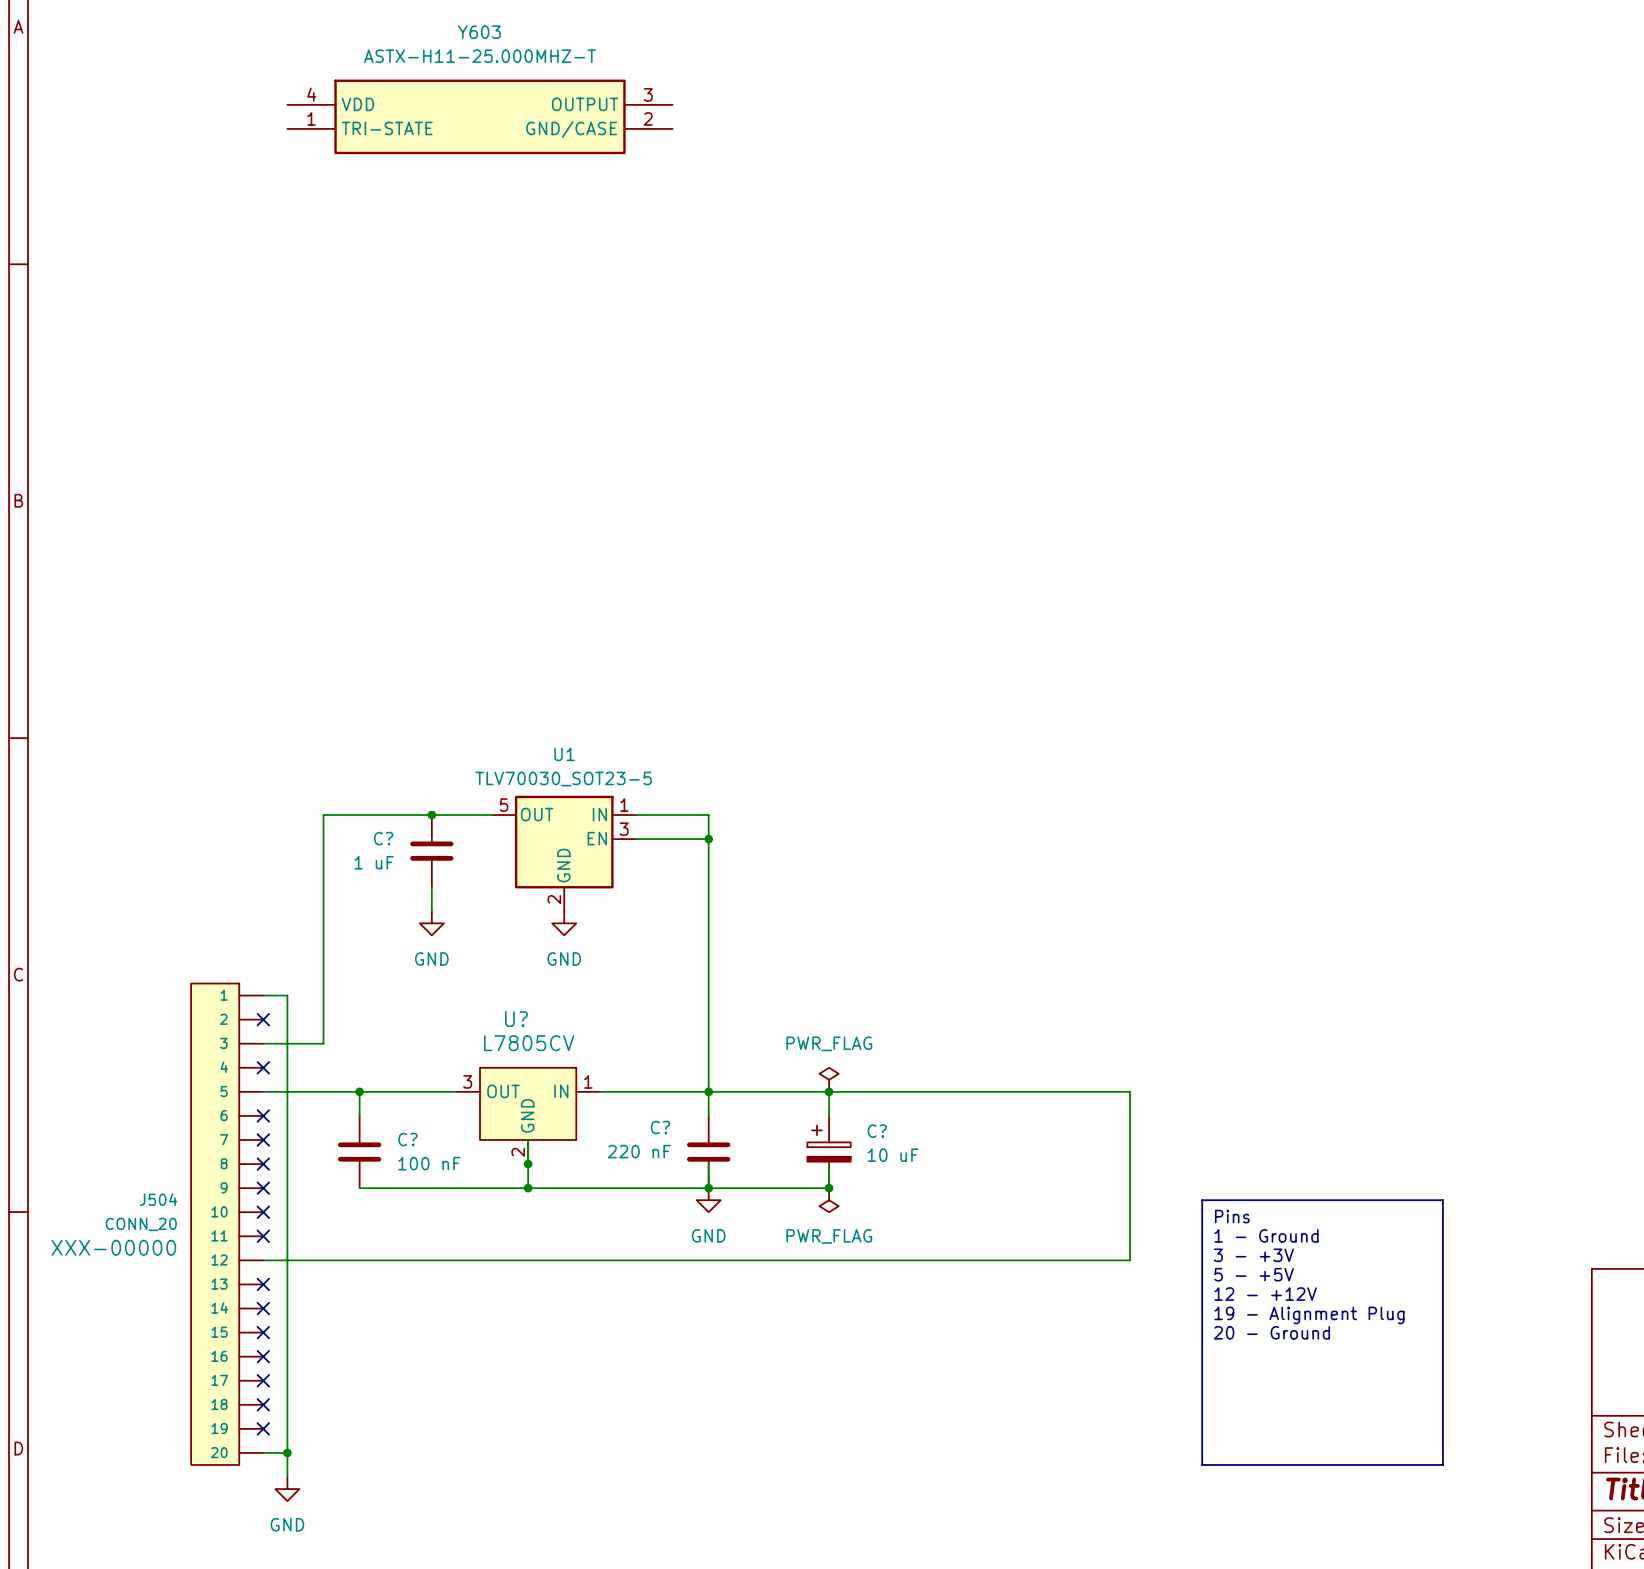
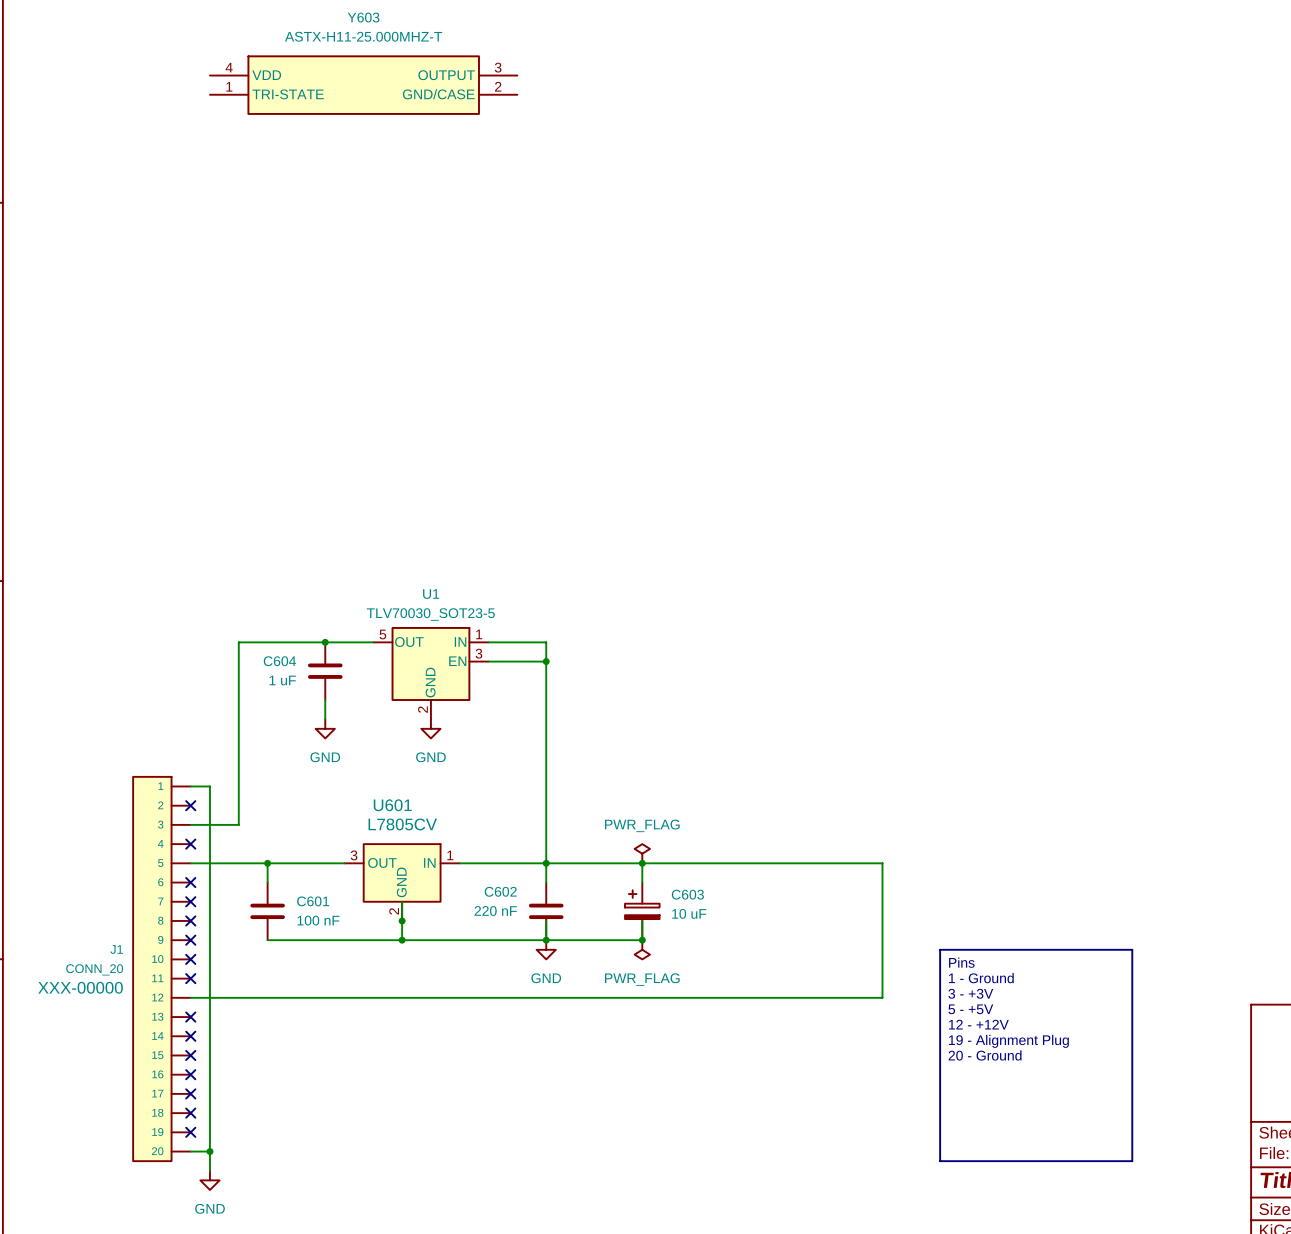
C? name: C? (383, 838) -> C604 (279, 661)
U? name: U? (516, 1019) -> U601 (392, 805)
C? name: C? (660, 1127) -> C602 (500, 891)
C? name: C? (877, 1131) -> C603 (687, 894)
C? name: C? (407, 1139) -> C601 (313, 901)
J504 name: J504 (158, 1199) -> J1 (116, 949)

